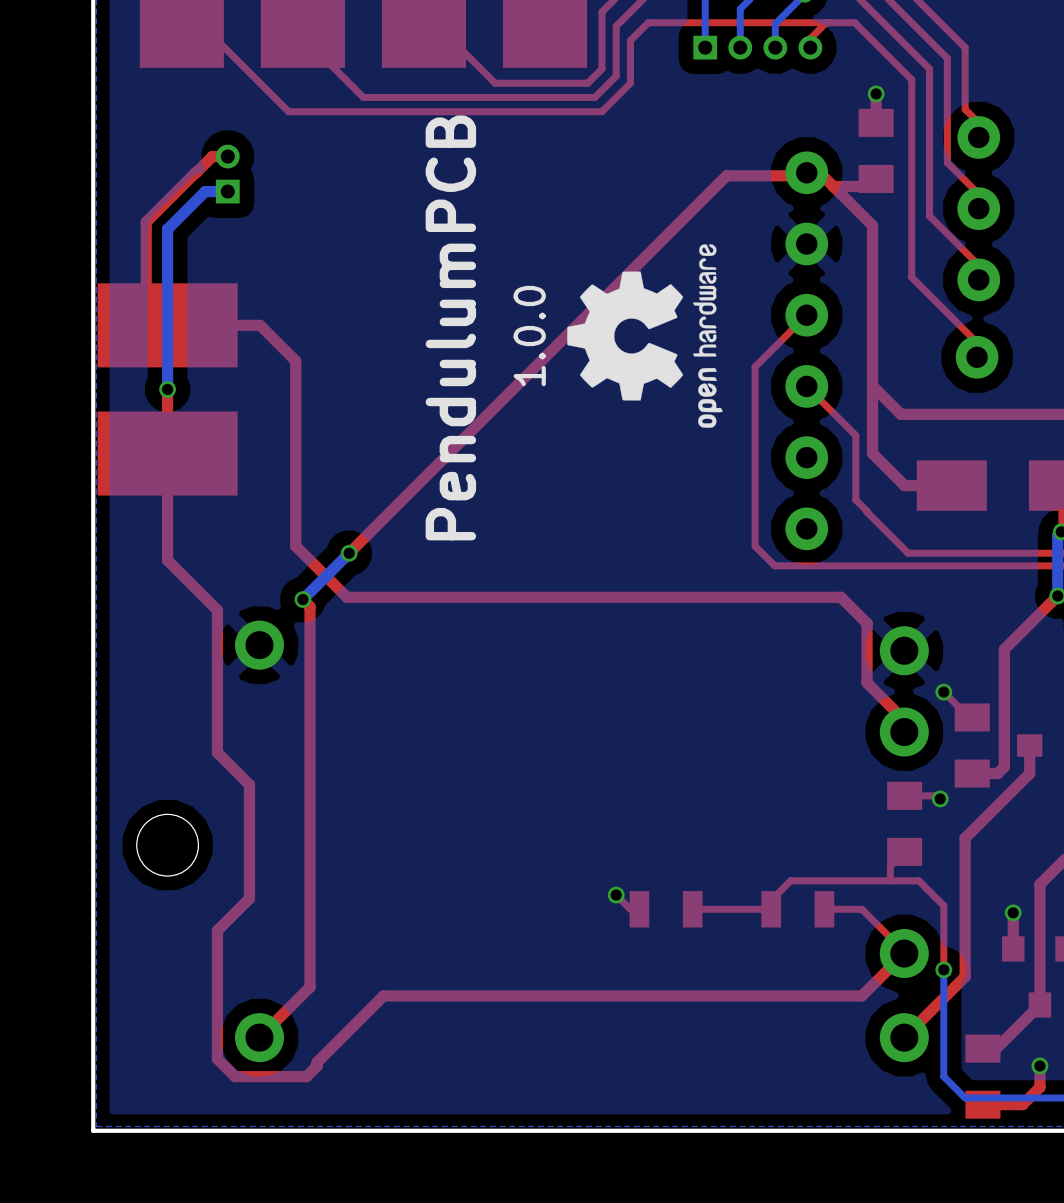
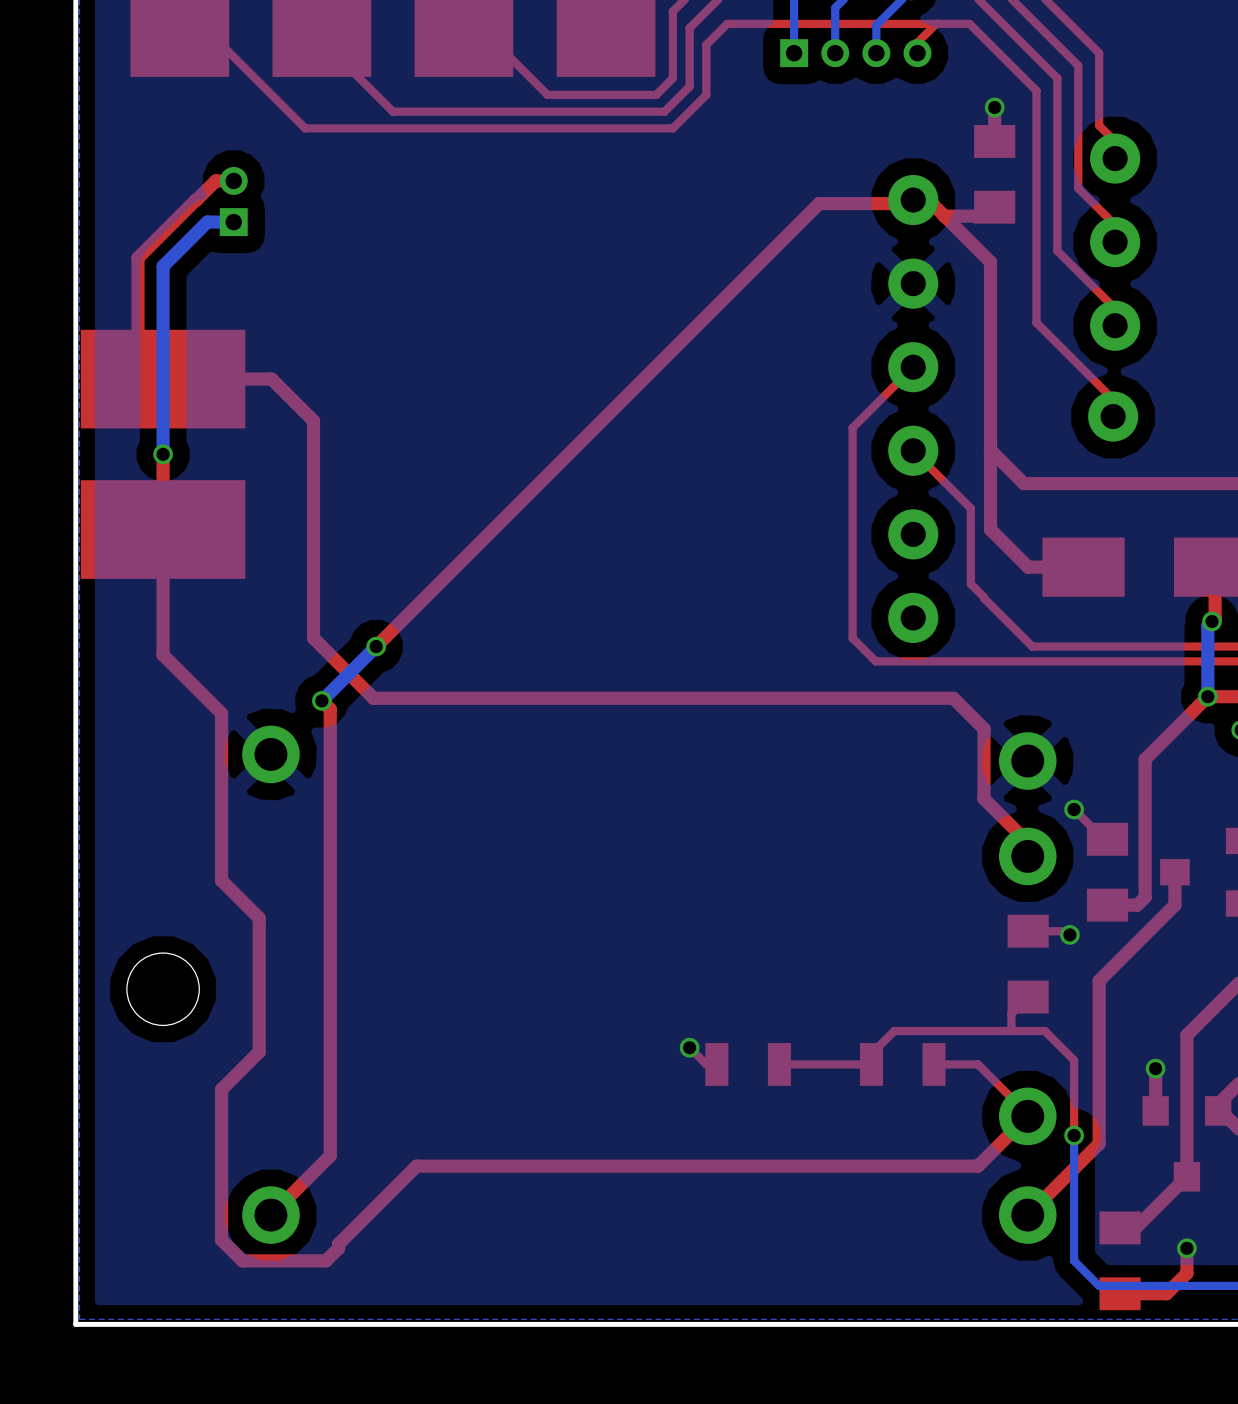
drawing: [567, 244, 723, 428] -> none
text: PendulumPCB (450, 327) -> none
text: 1.0.0 (529, 336) -> none

